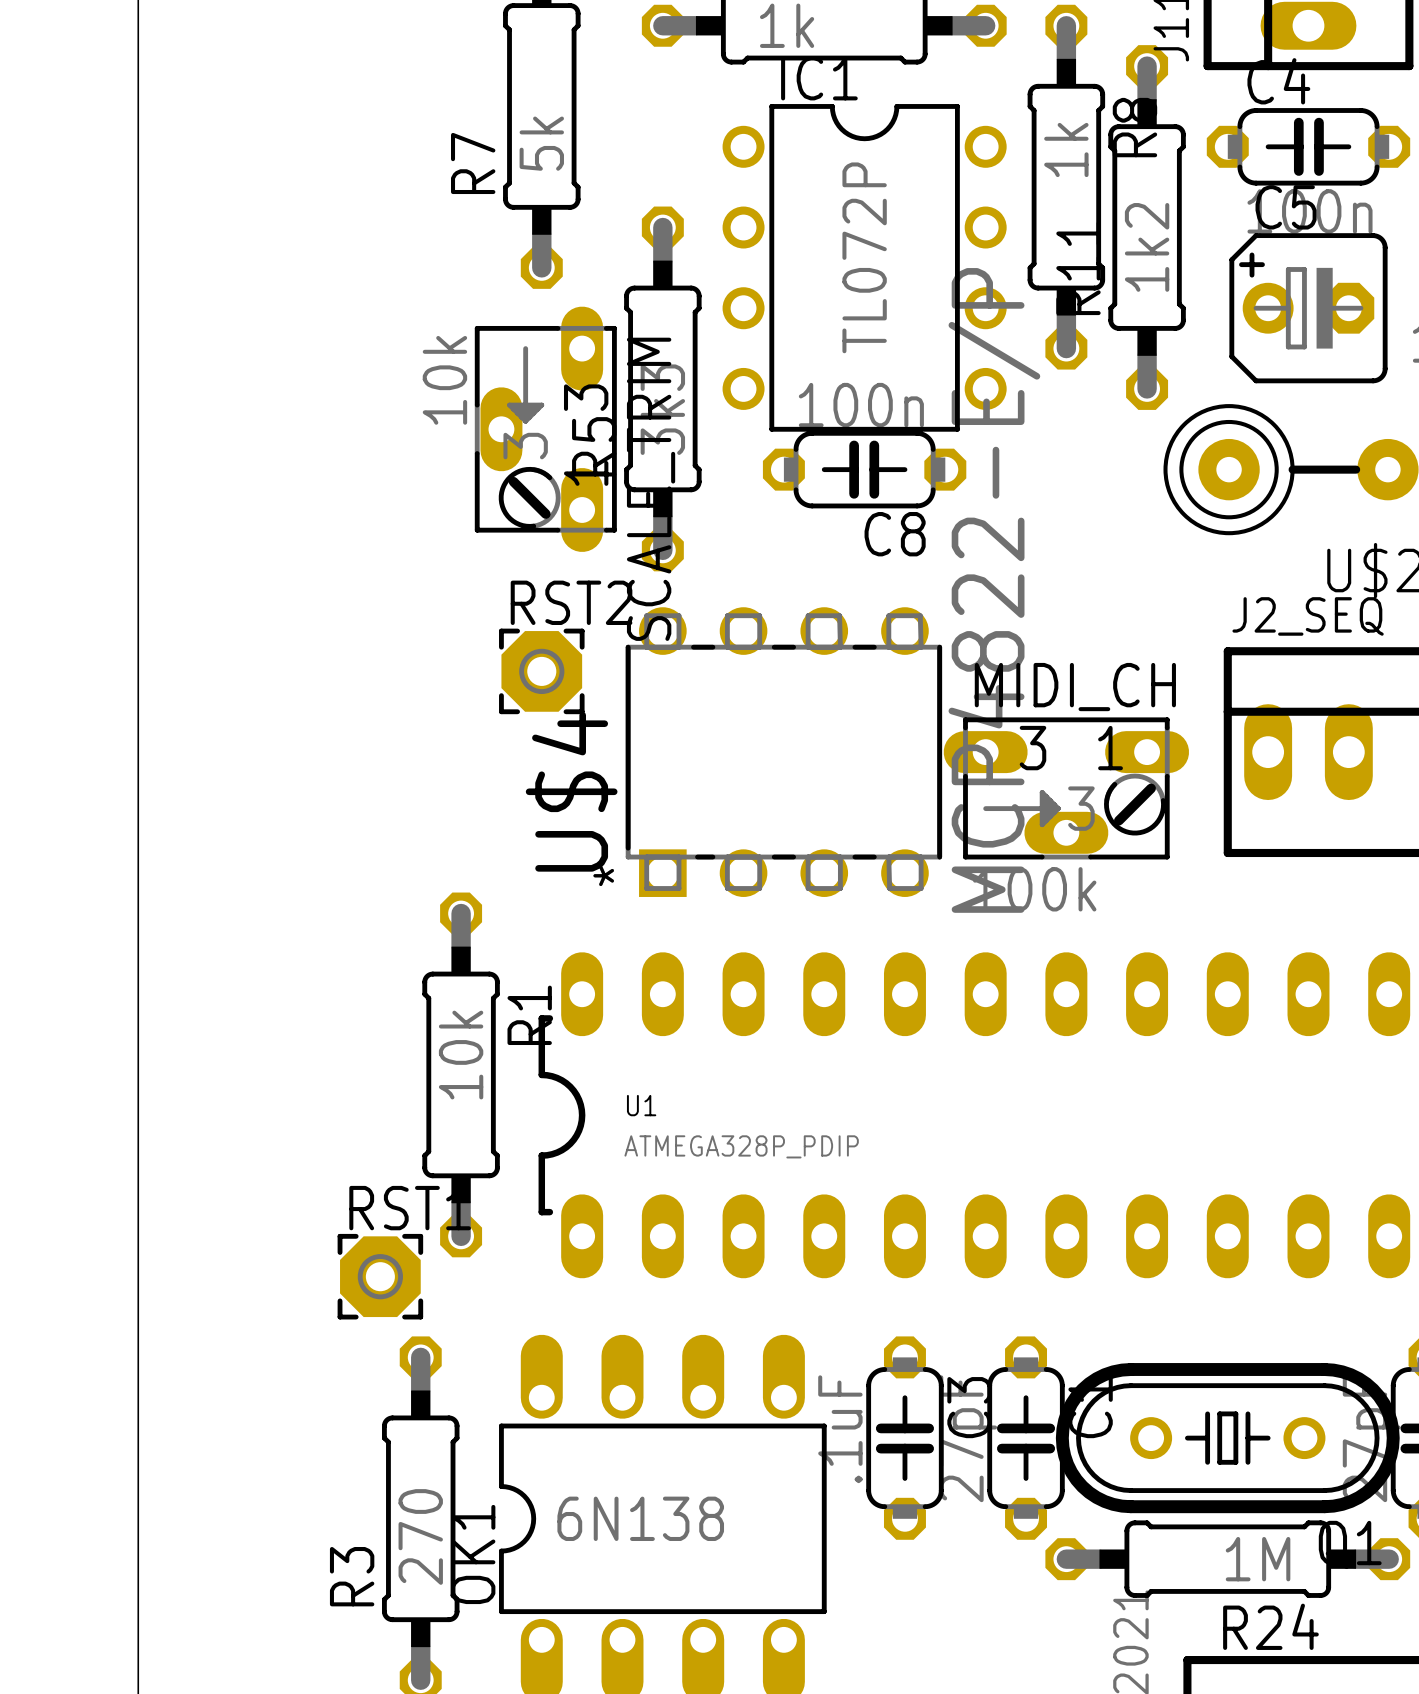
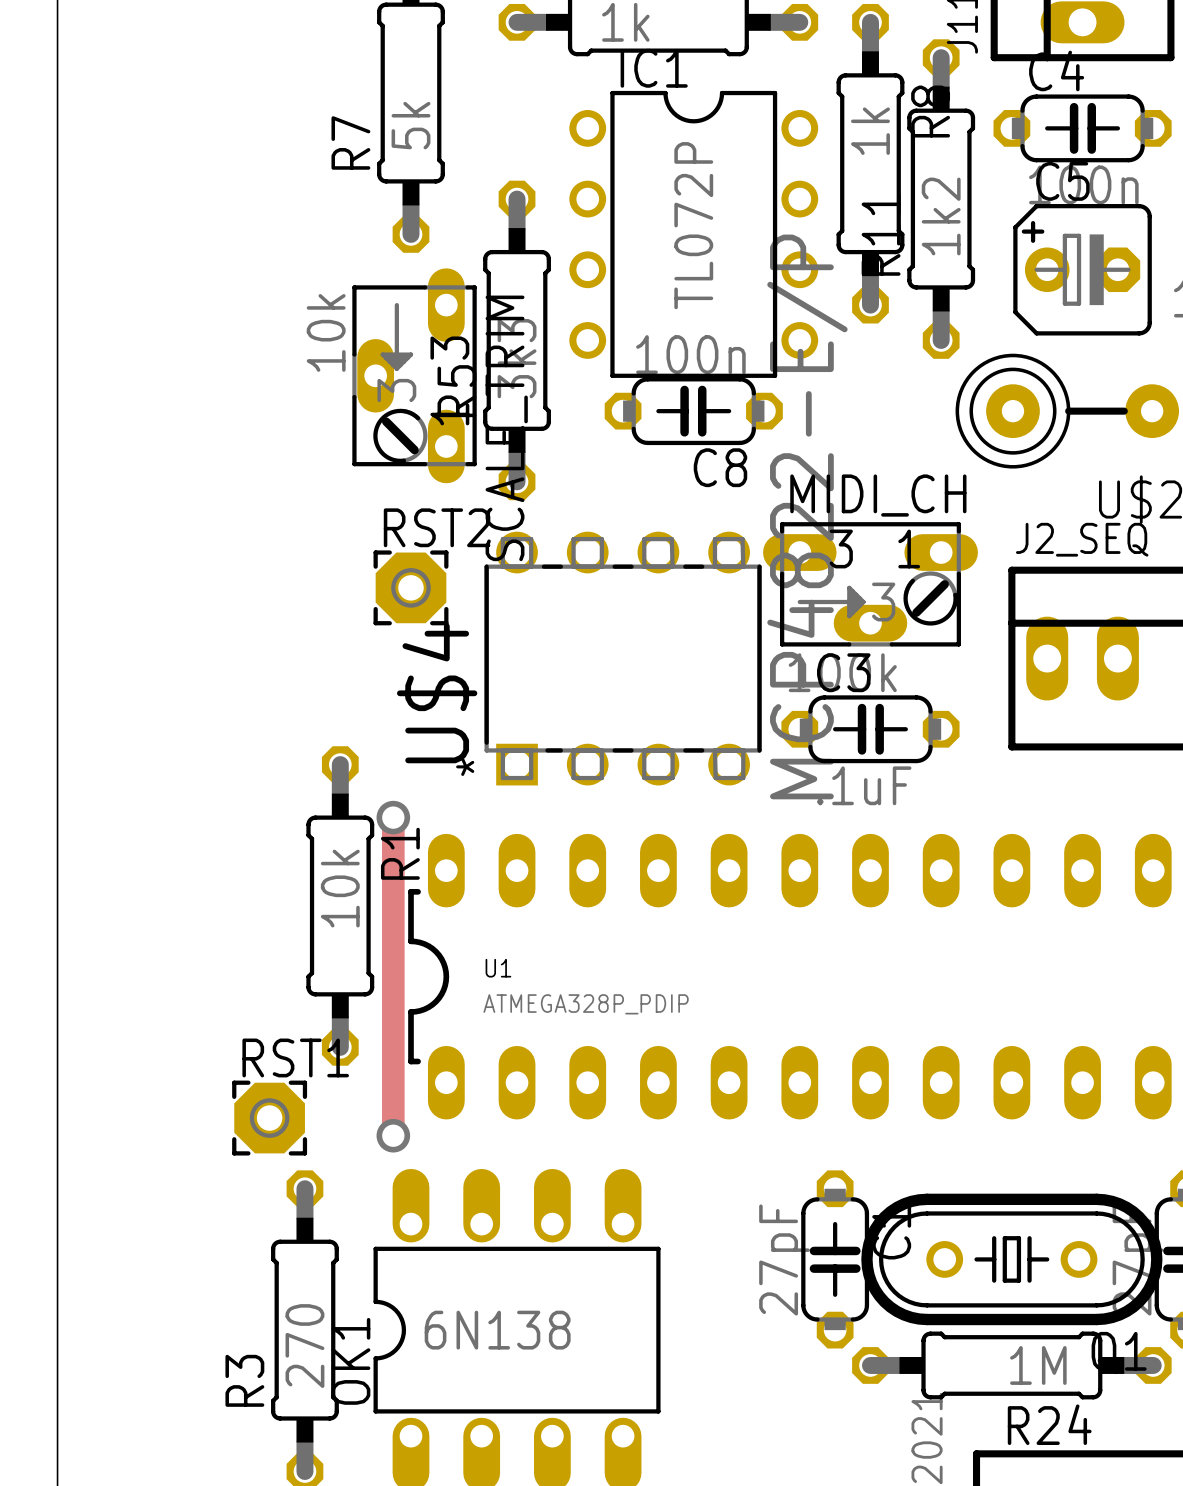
MIDI_CH position: (1066, 788) -> (870, 584)
track: none -> (393, 817) (393, 1135)
via: none -> (393, 817)
R1 position: (461, 1074) -> (340, 905)
via: none -> (393, 1135)
C3 rotation: 0° (904, 1438) -> 90° counterclockwise (870, 729)
C3 position: (904, 1438) -> (870, 729)

